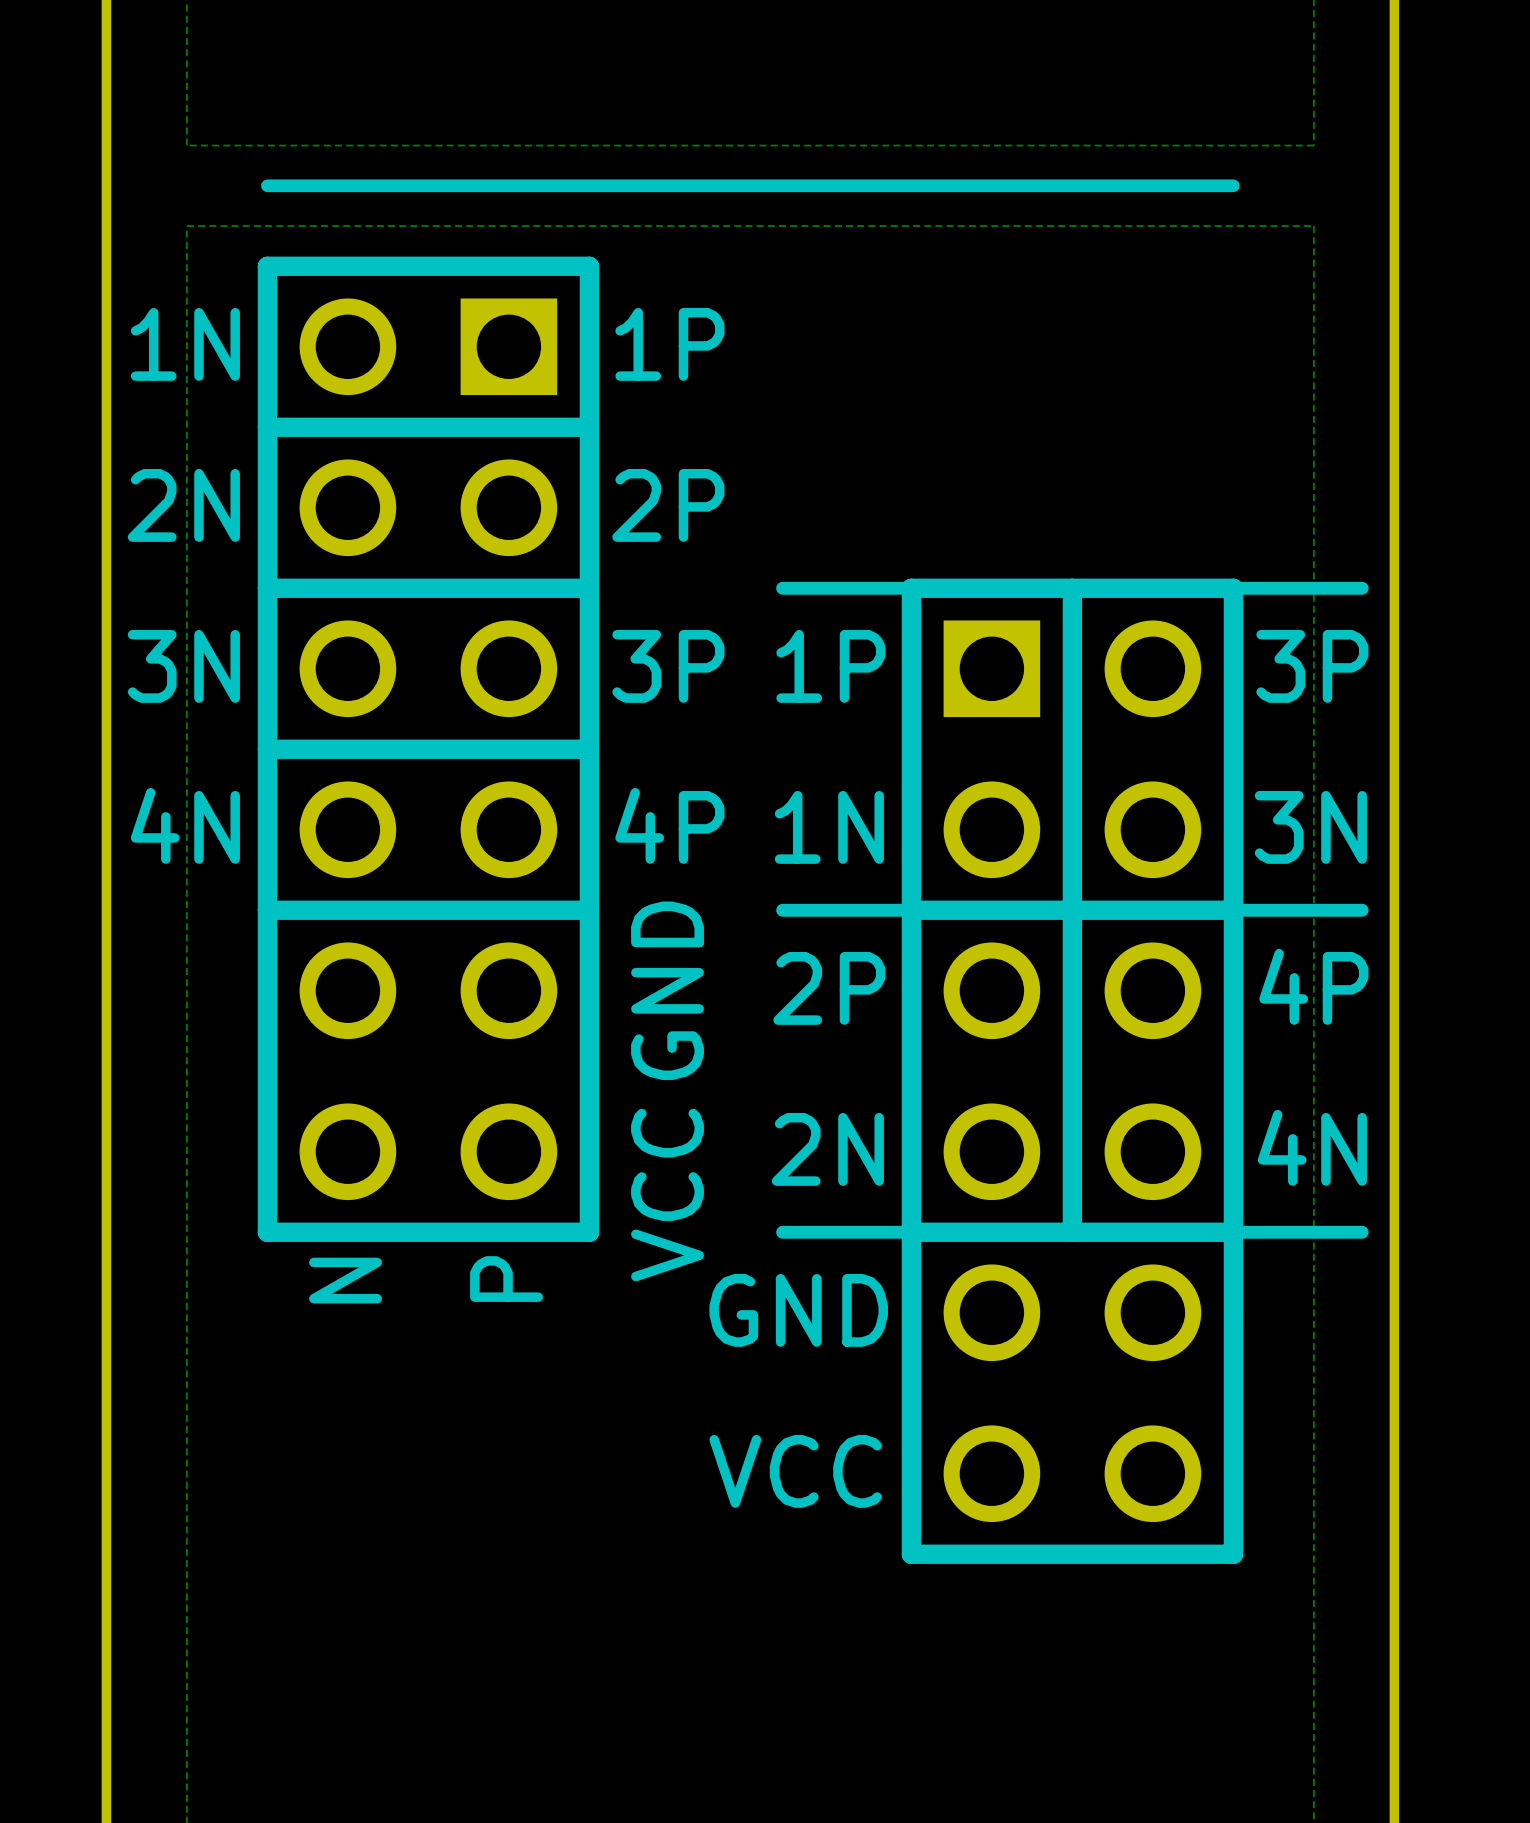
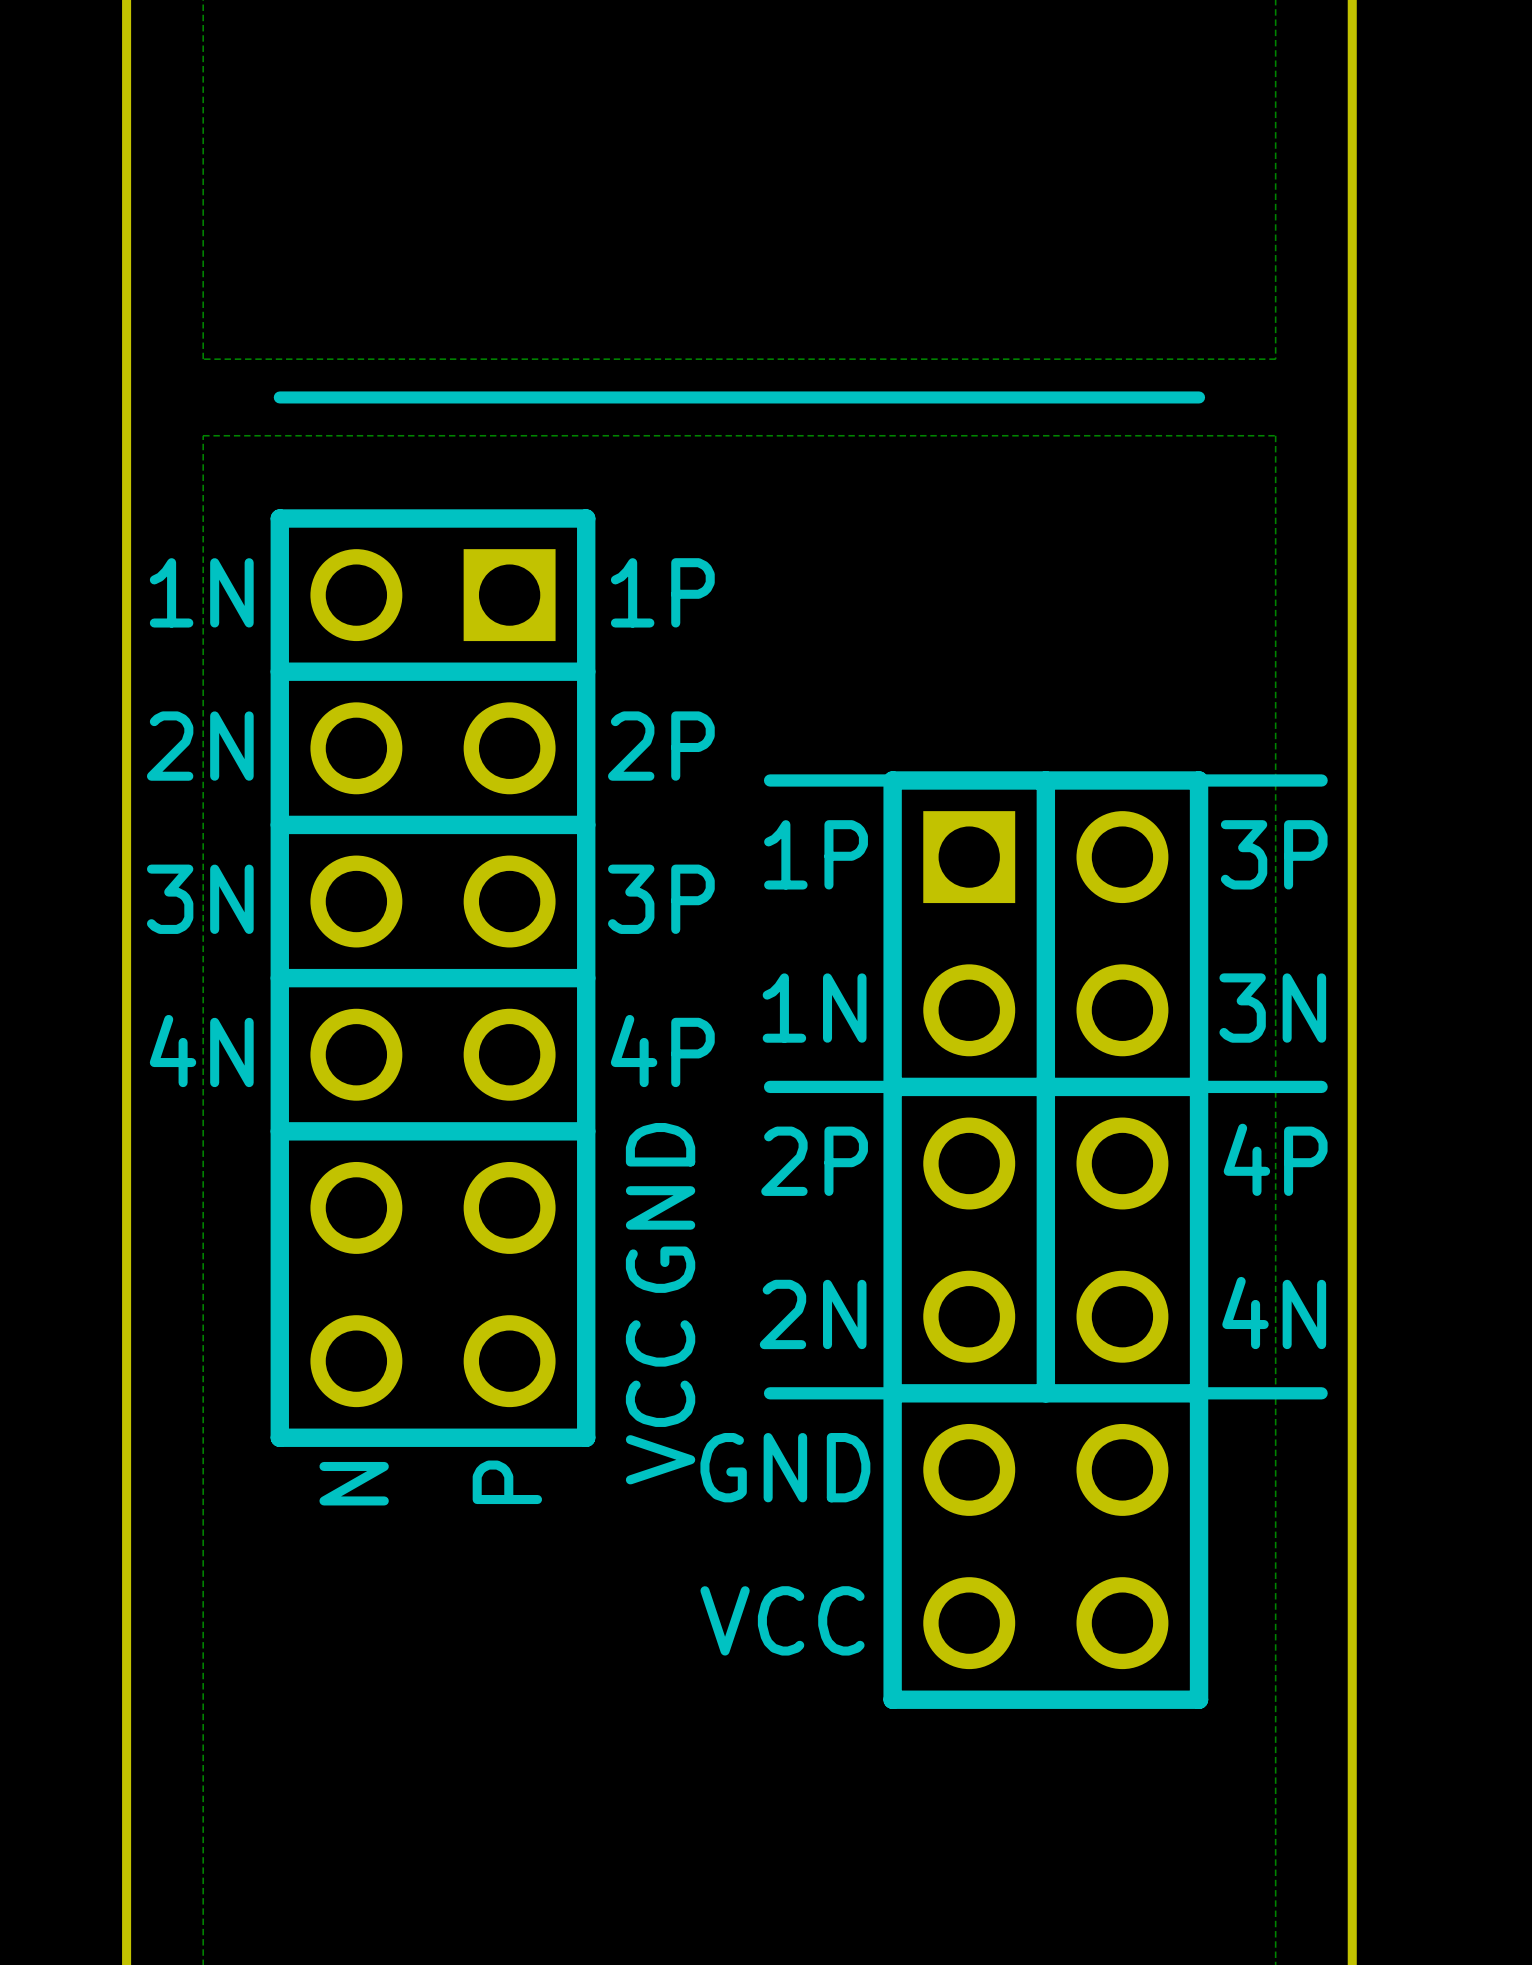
part position: (428, 749) -> (433, 978)

